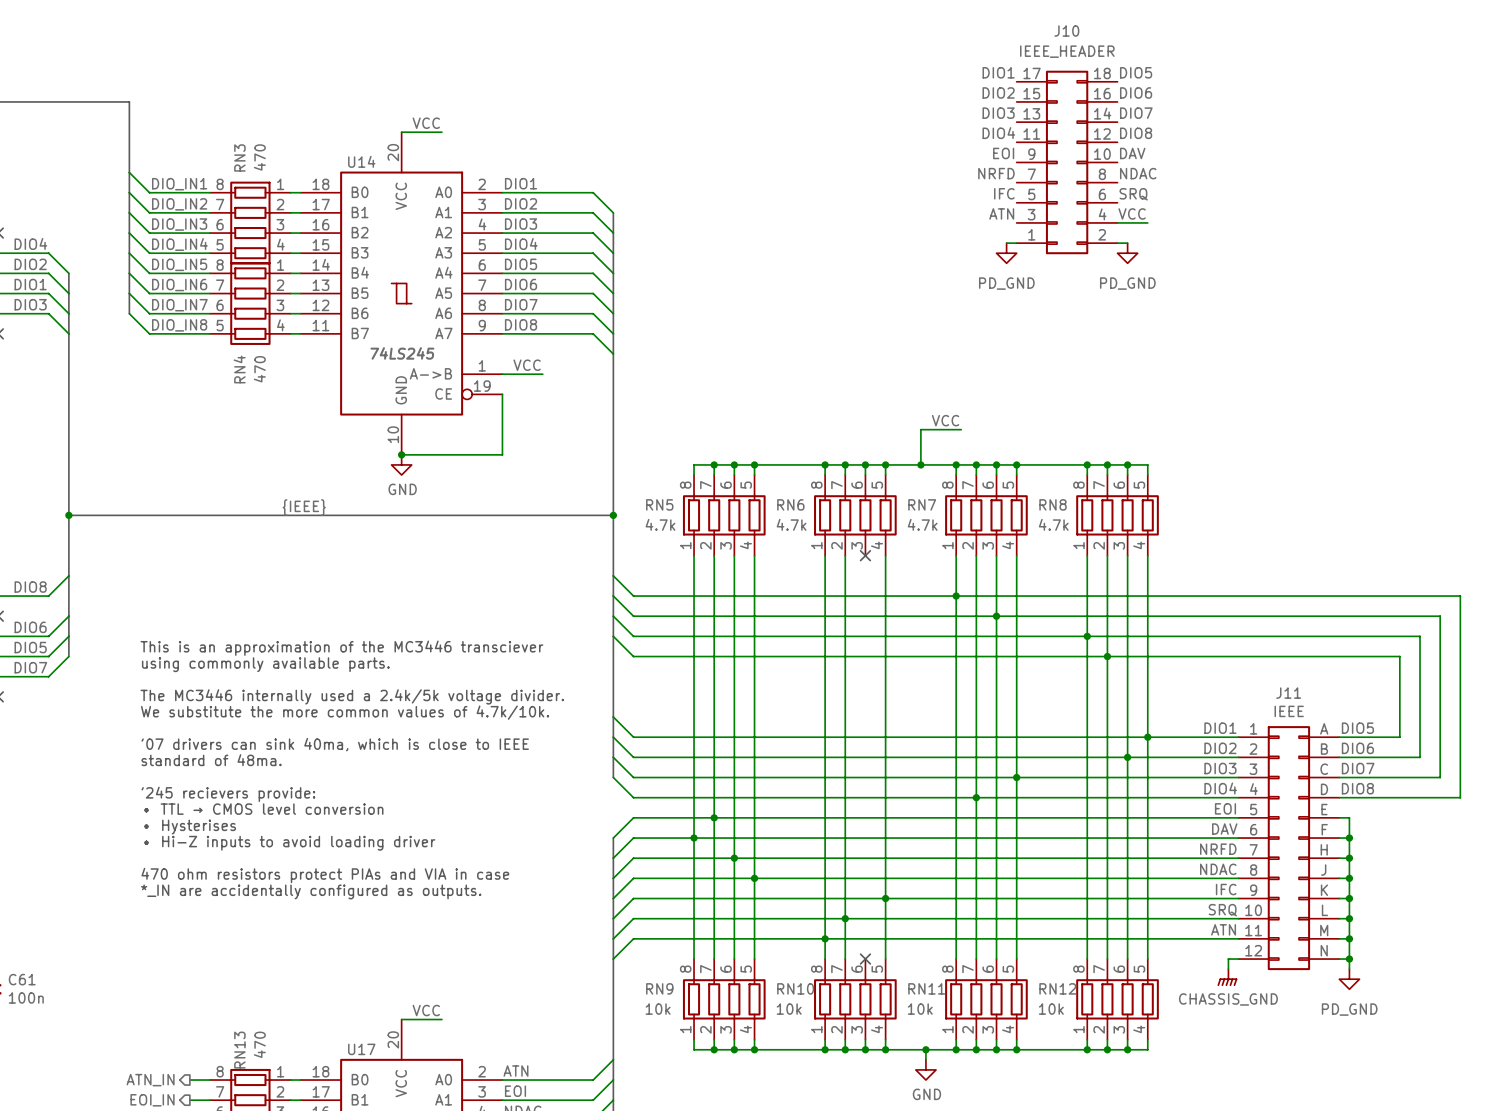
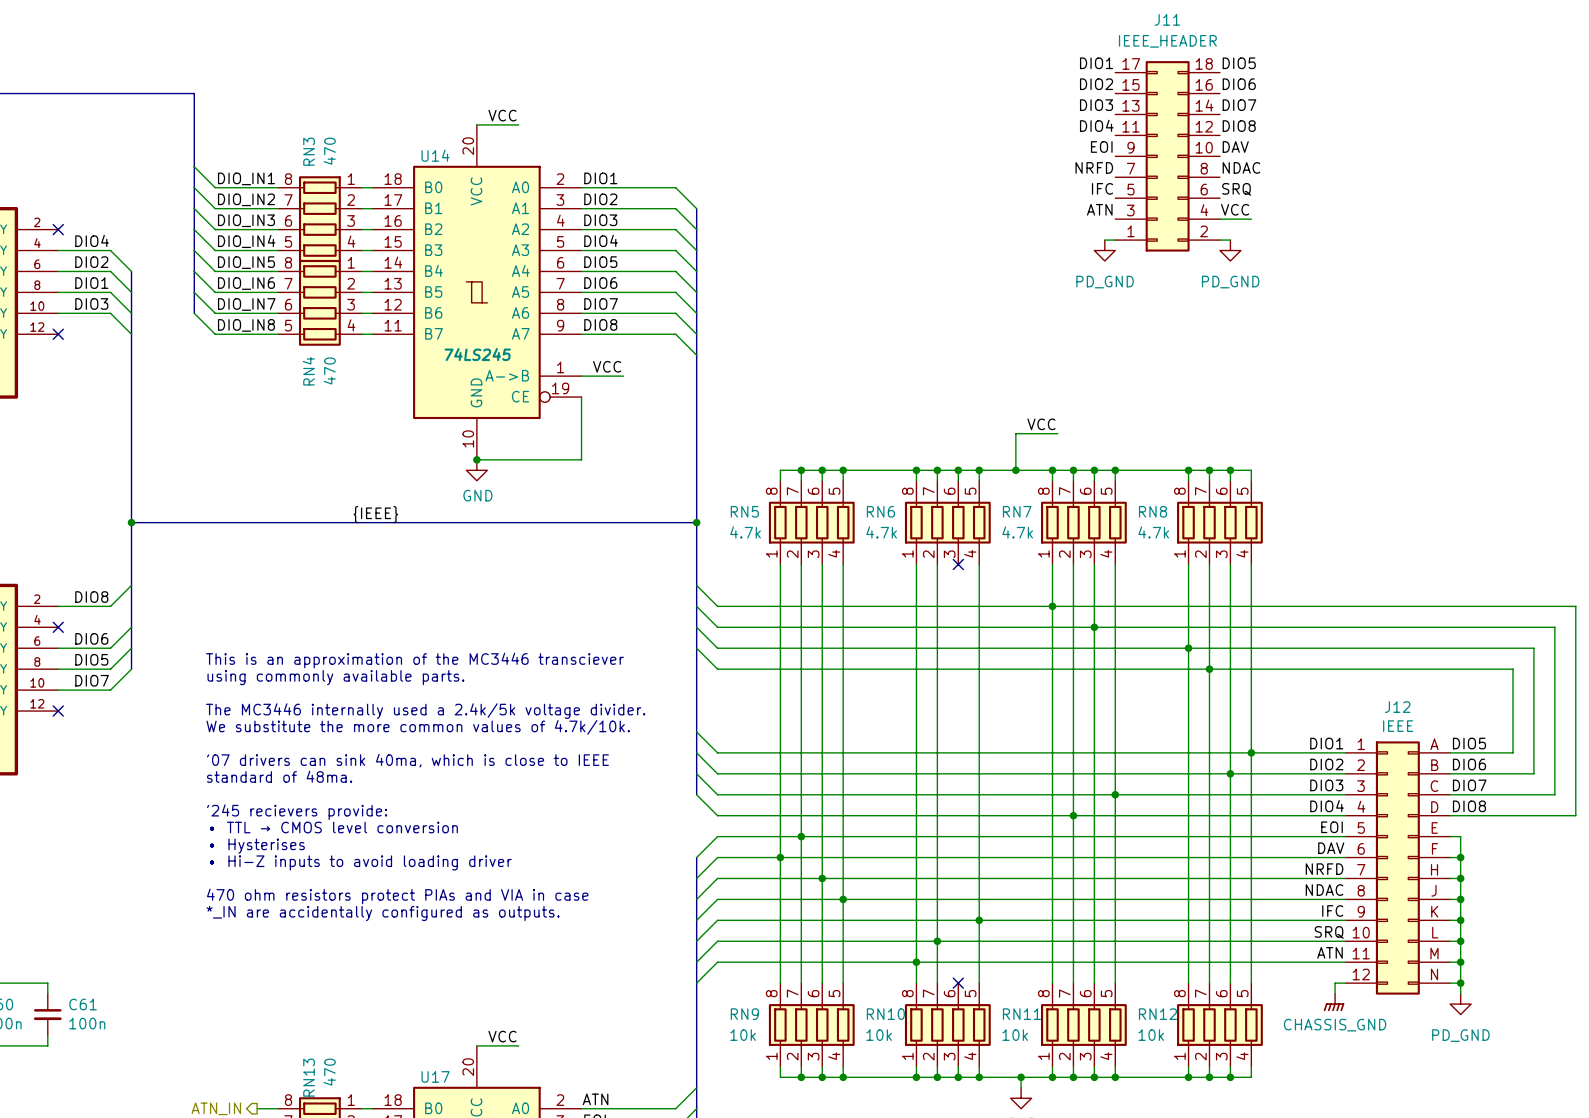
J10 name: J10 (1066, 31) -> J11 (1167, 19)
J11 name: J11 (1288, 693) -> J12 (1397, 707)

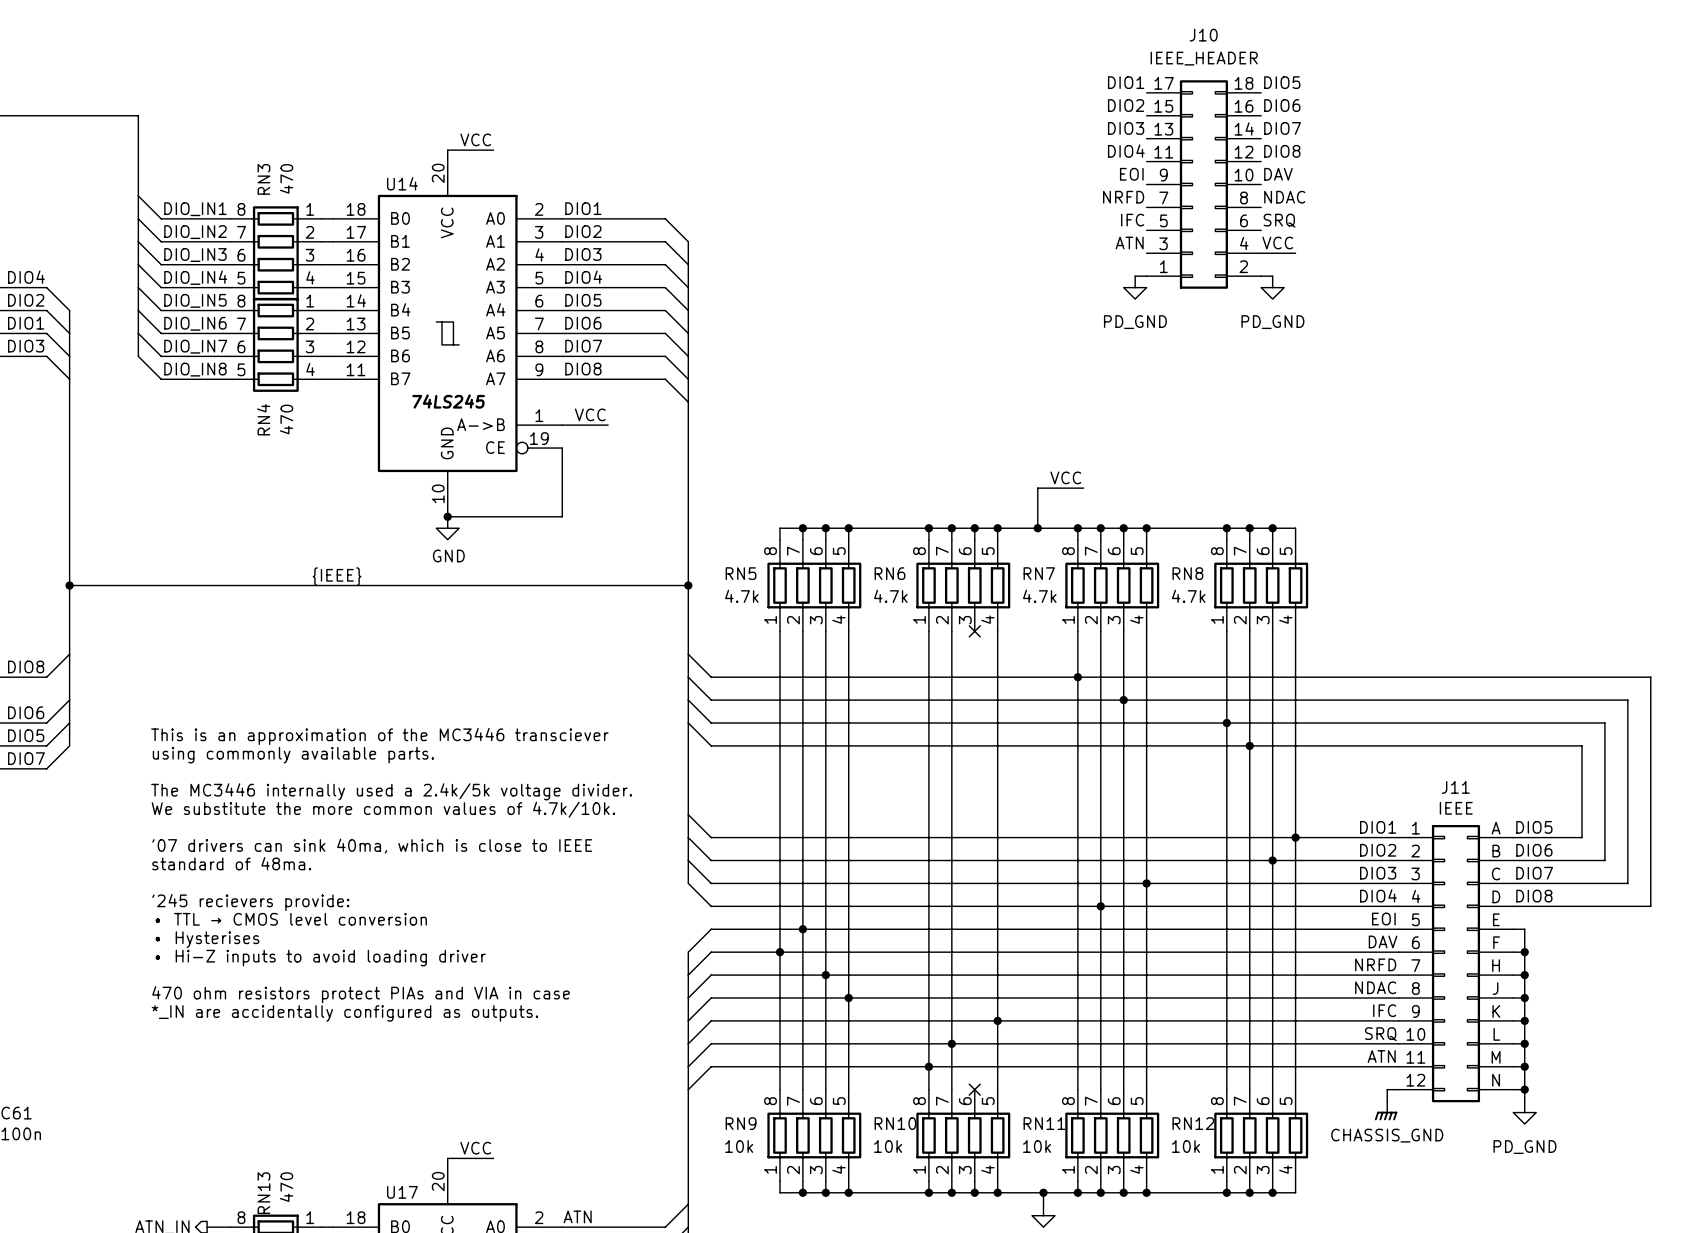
J11 name: J11 (1167, 19) -> J10 (1203, 35)
J12 name: J12 (1397, 707) -> J11 (1455, 787)

